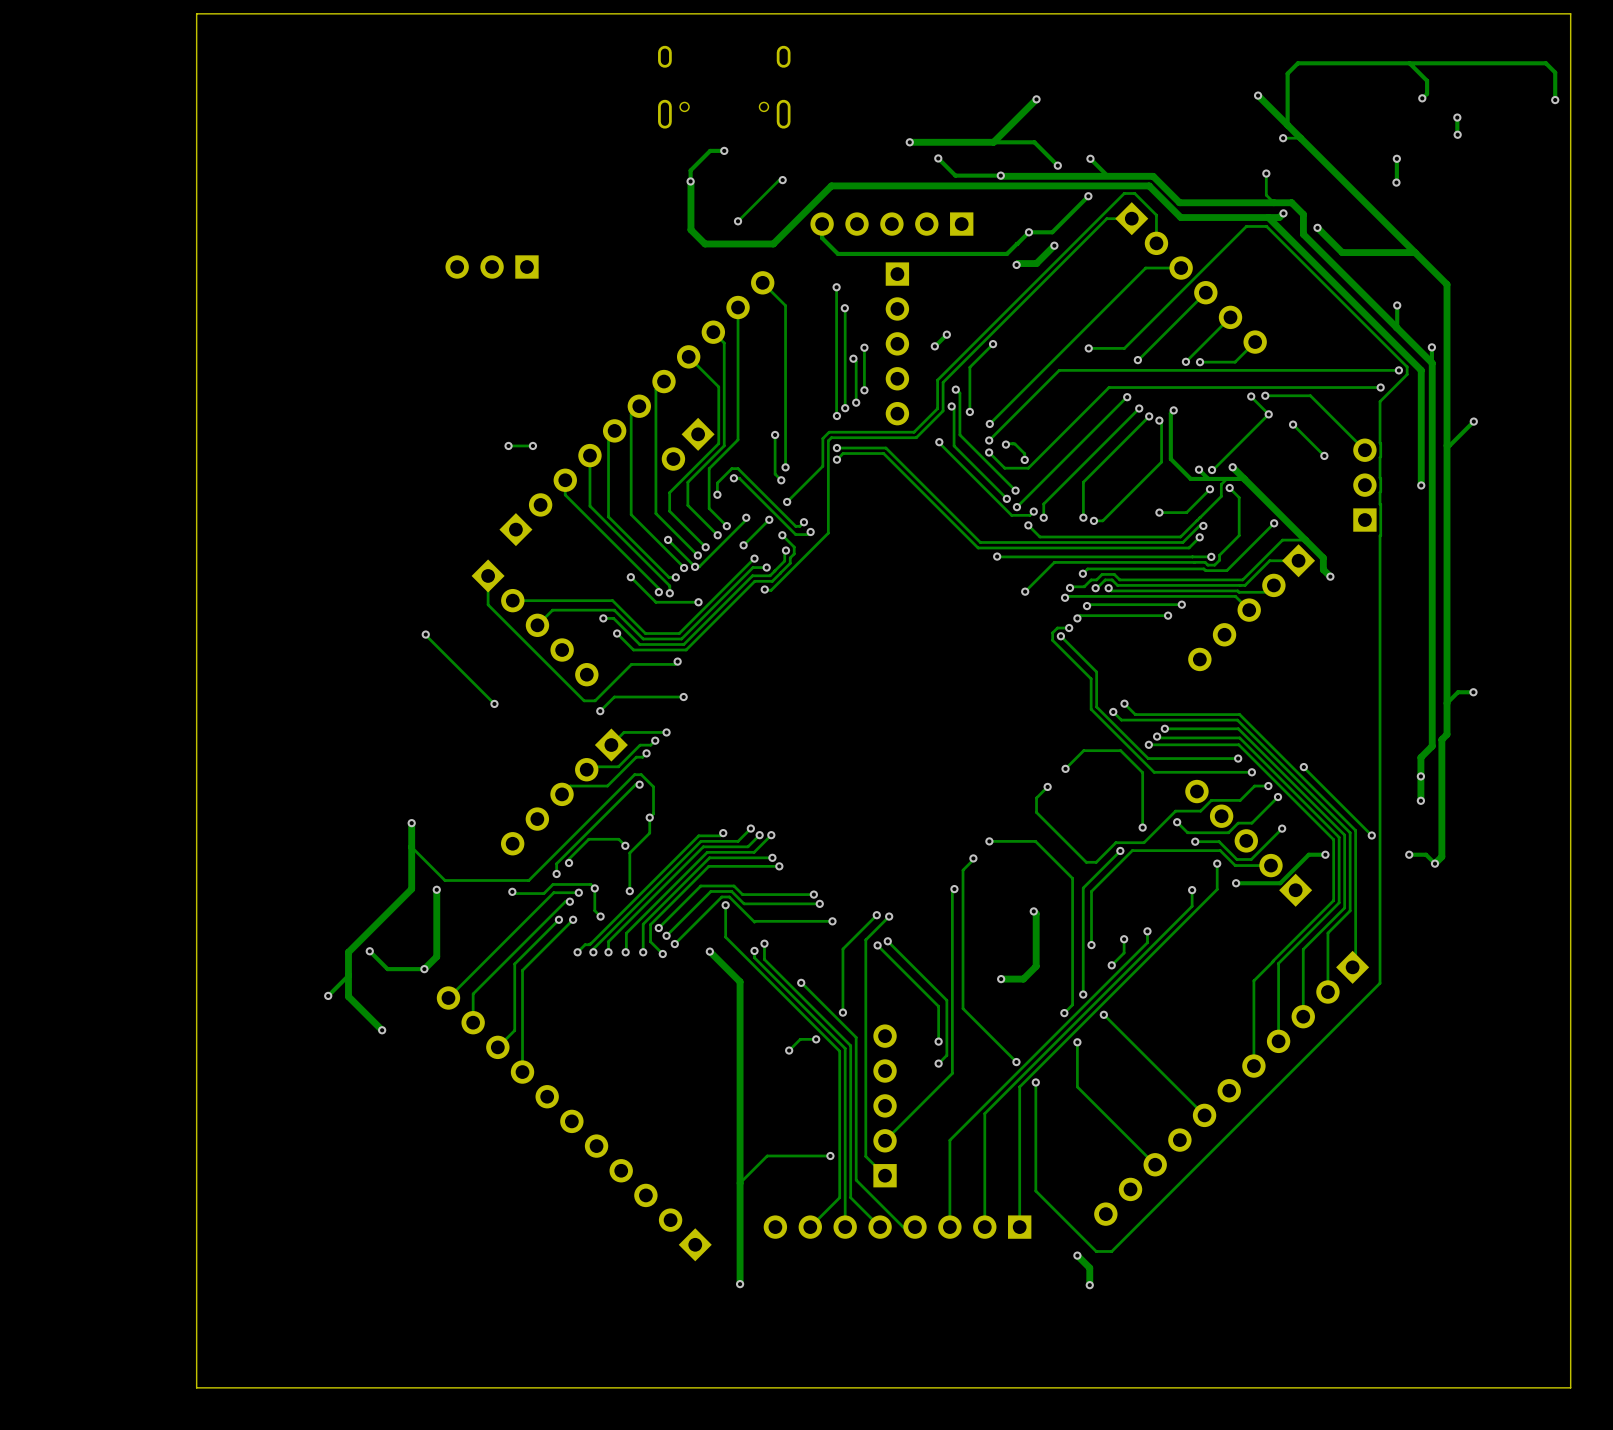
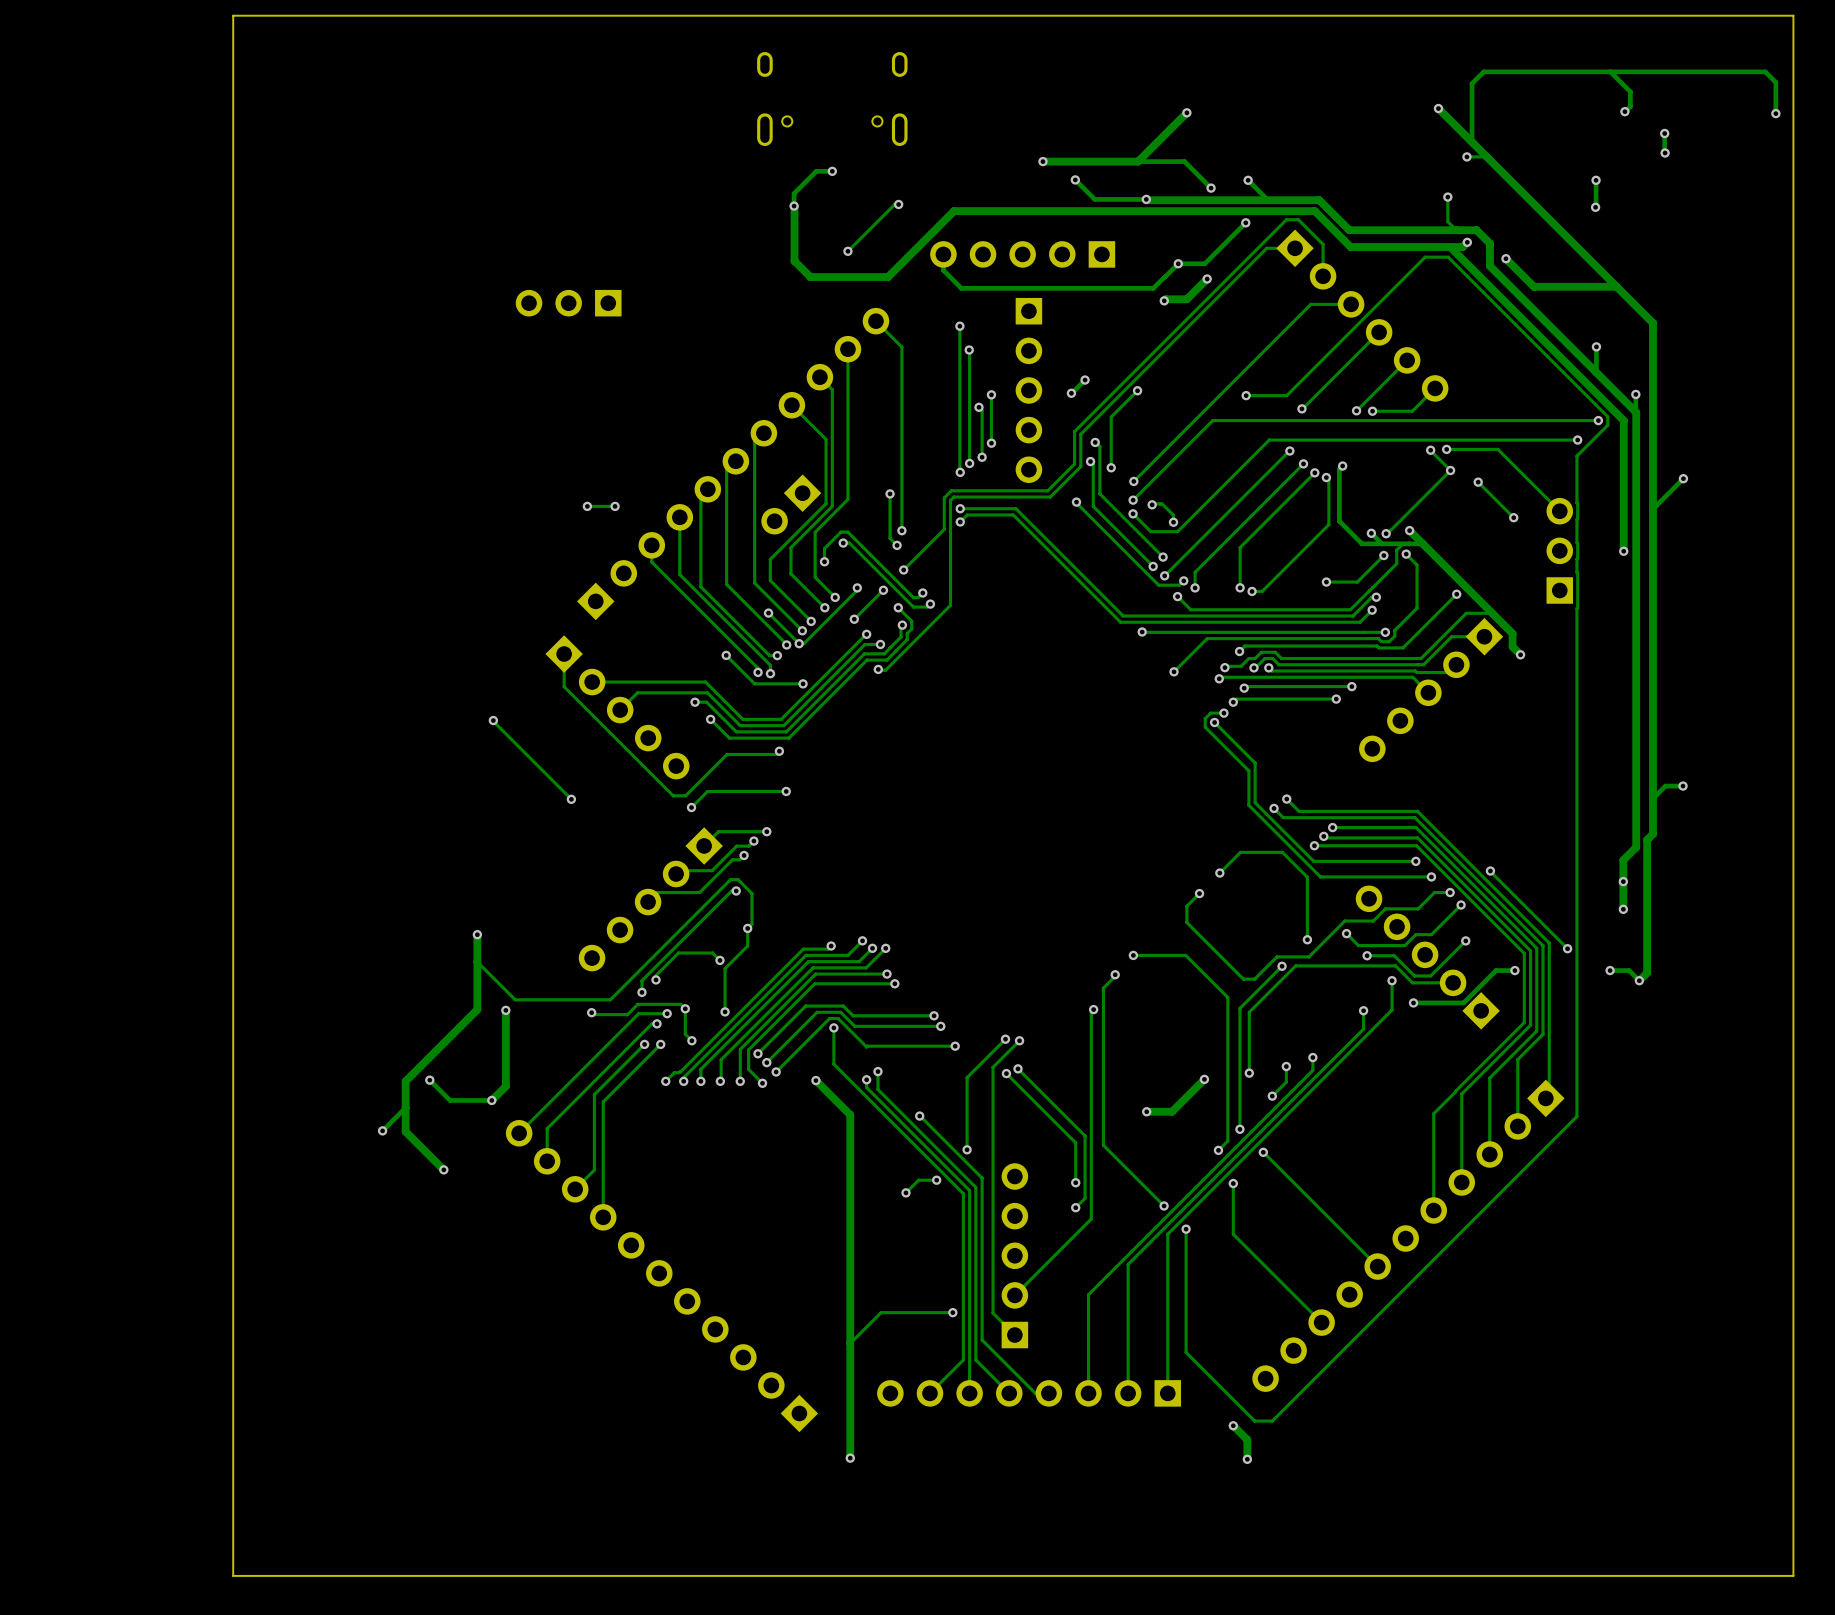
track: (1033, 911) (1036, 913) (1036, 966) -> (1204, 1079) (1186, 1097)
via position: (1033, 911) -> (1204, 1079)

